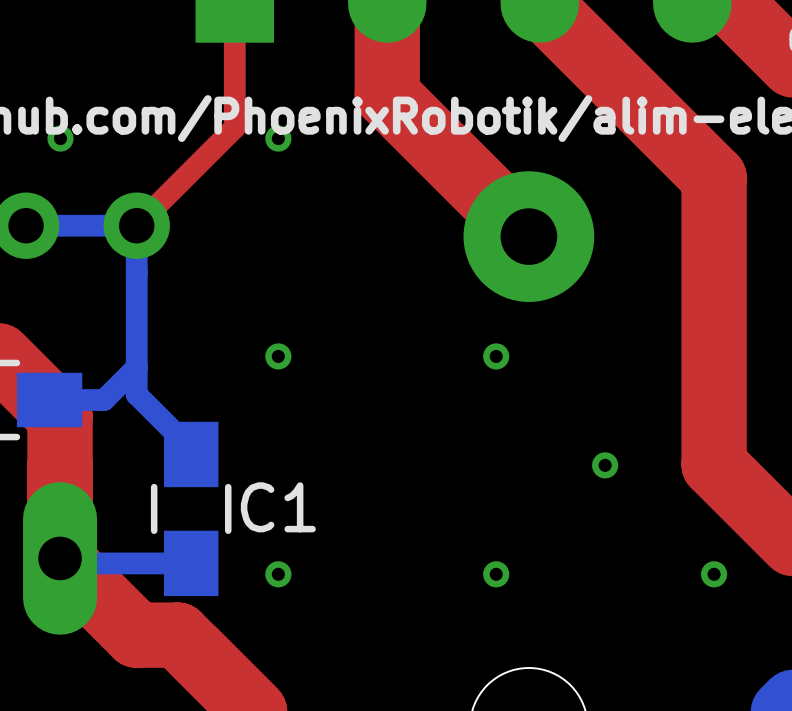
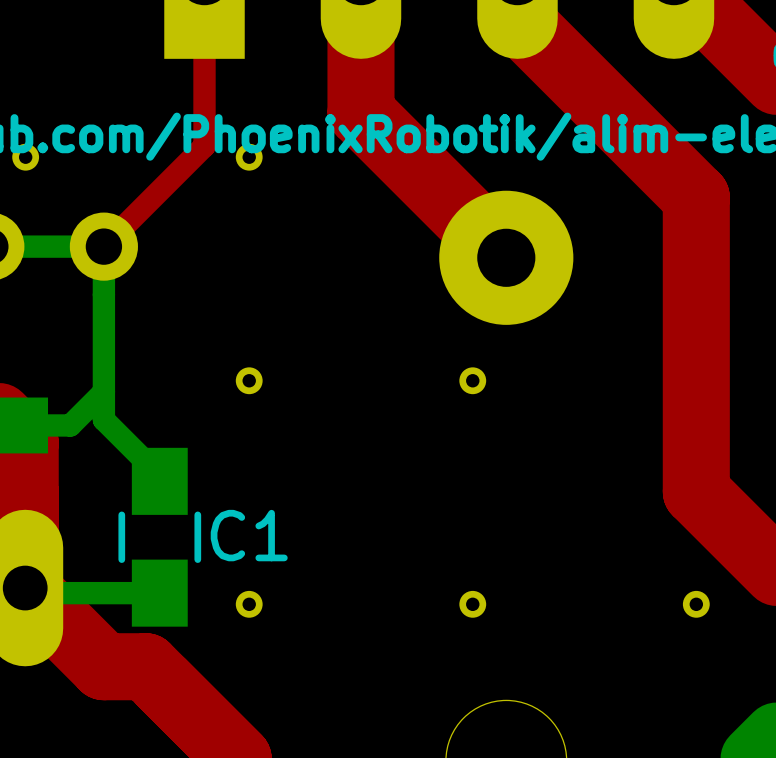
part: (605, 465) -> none

